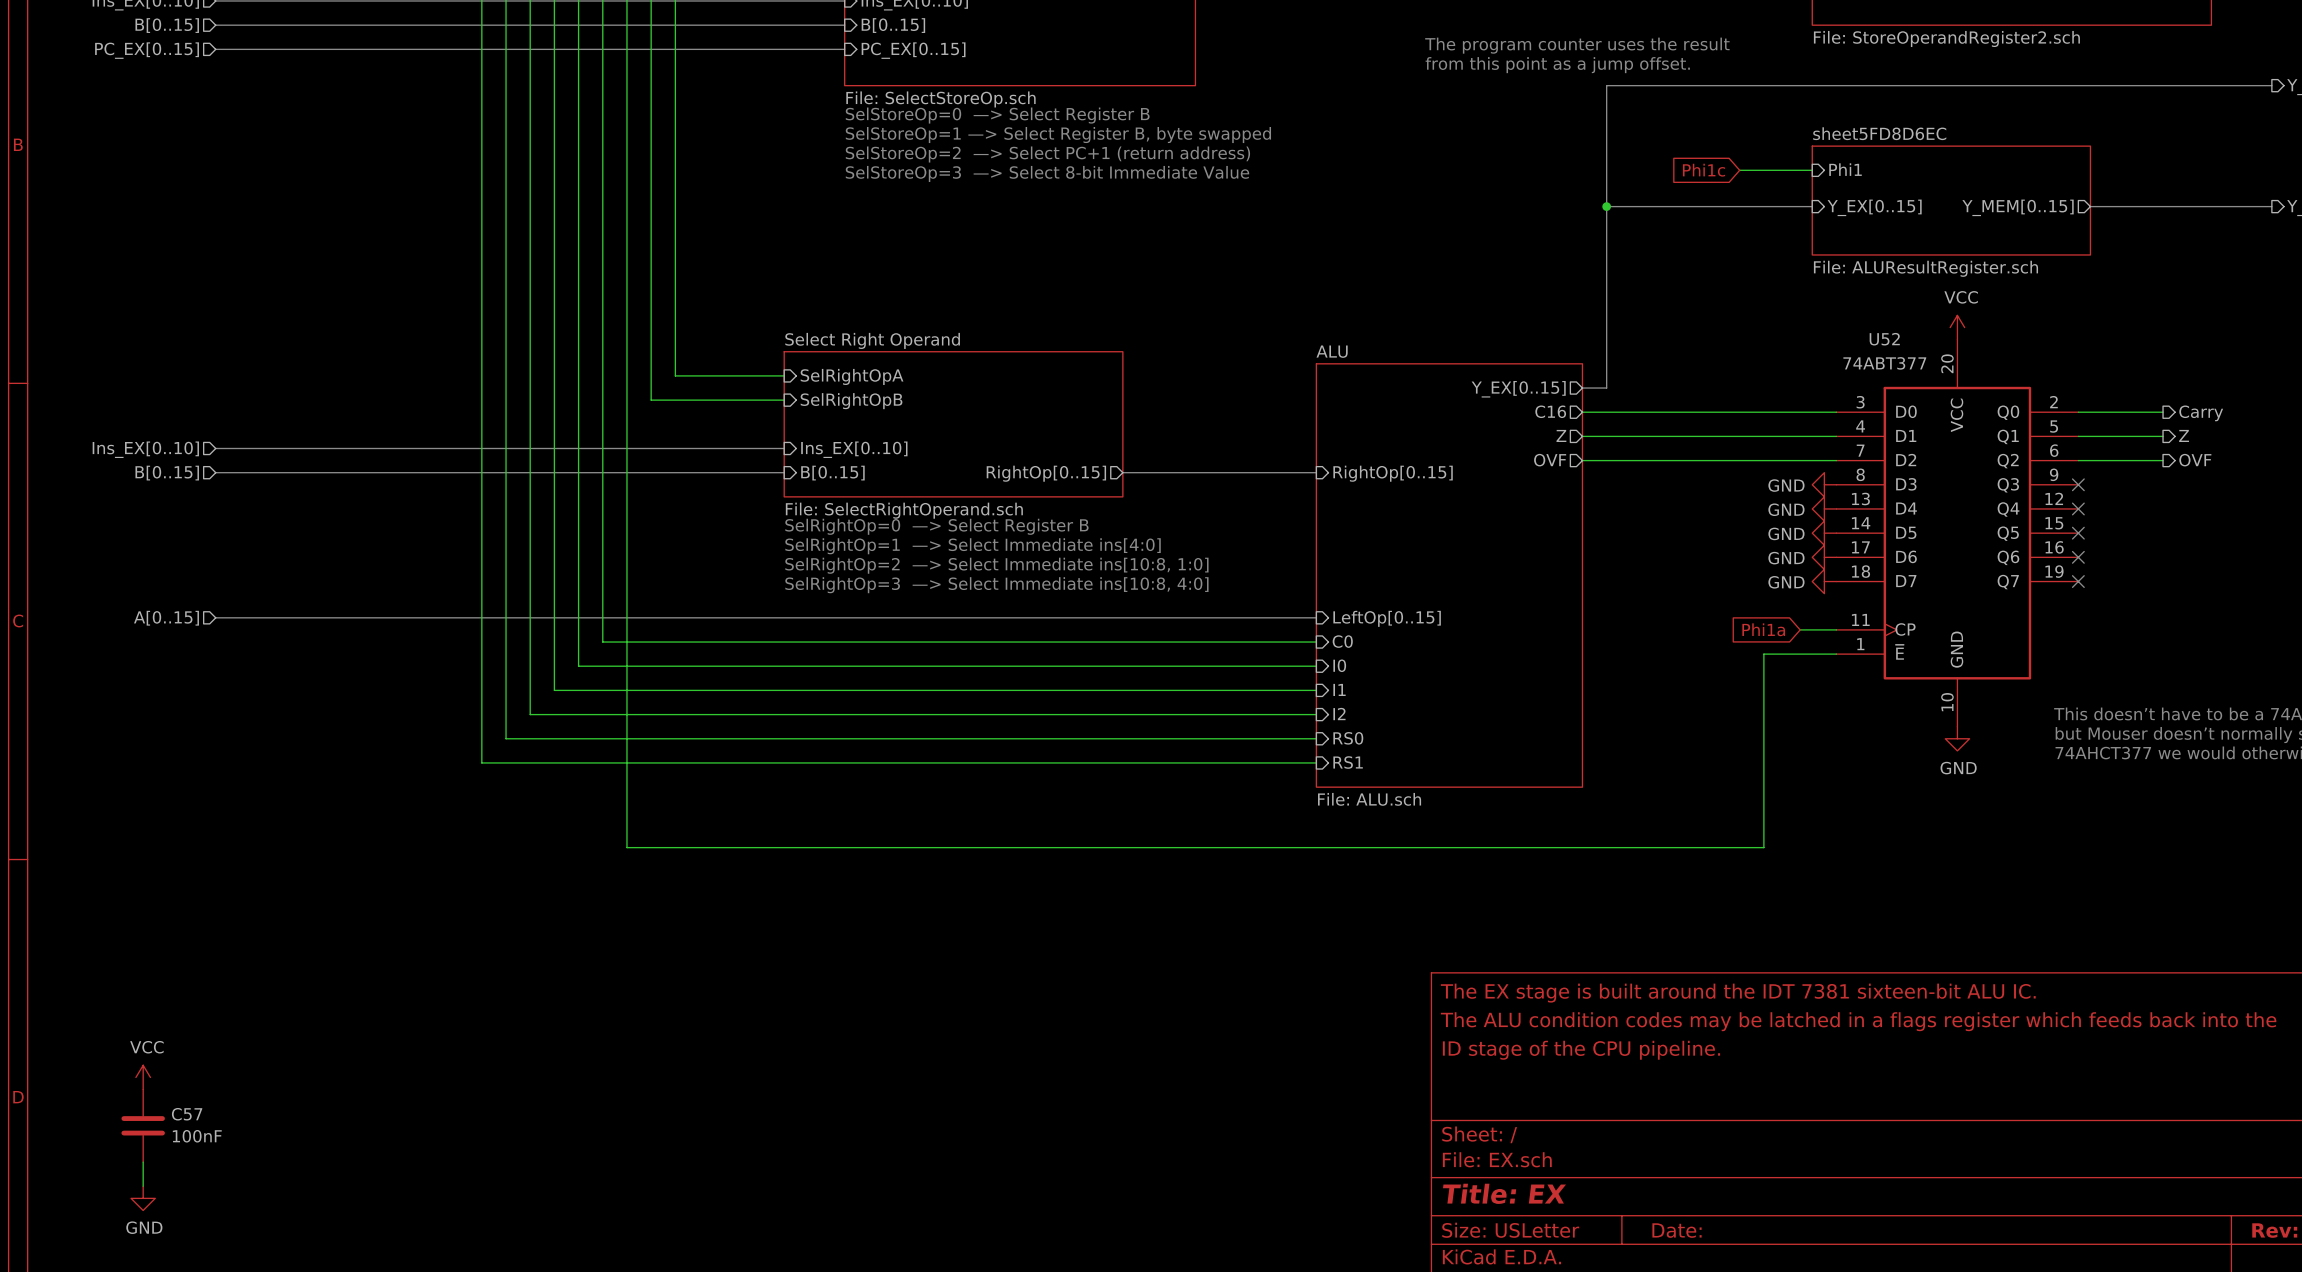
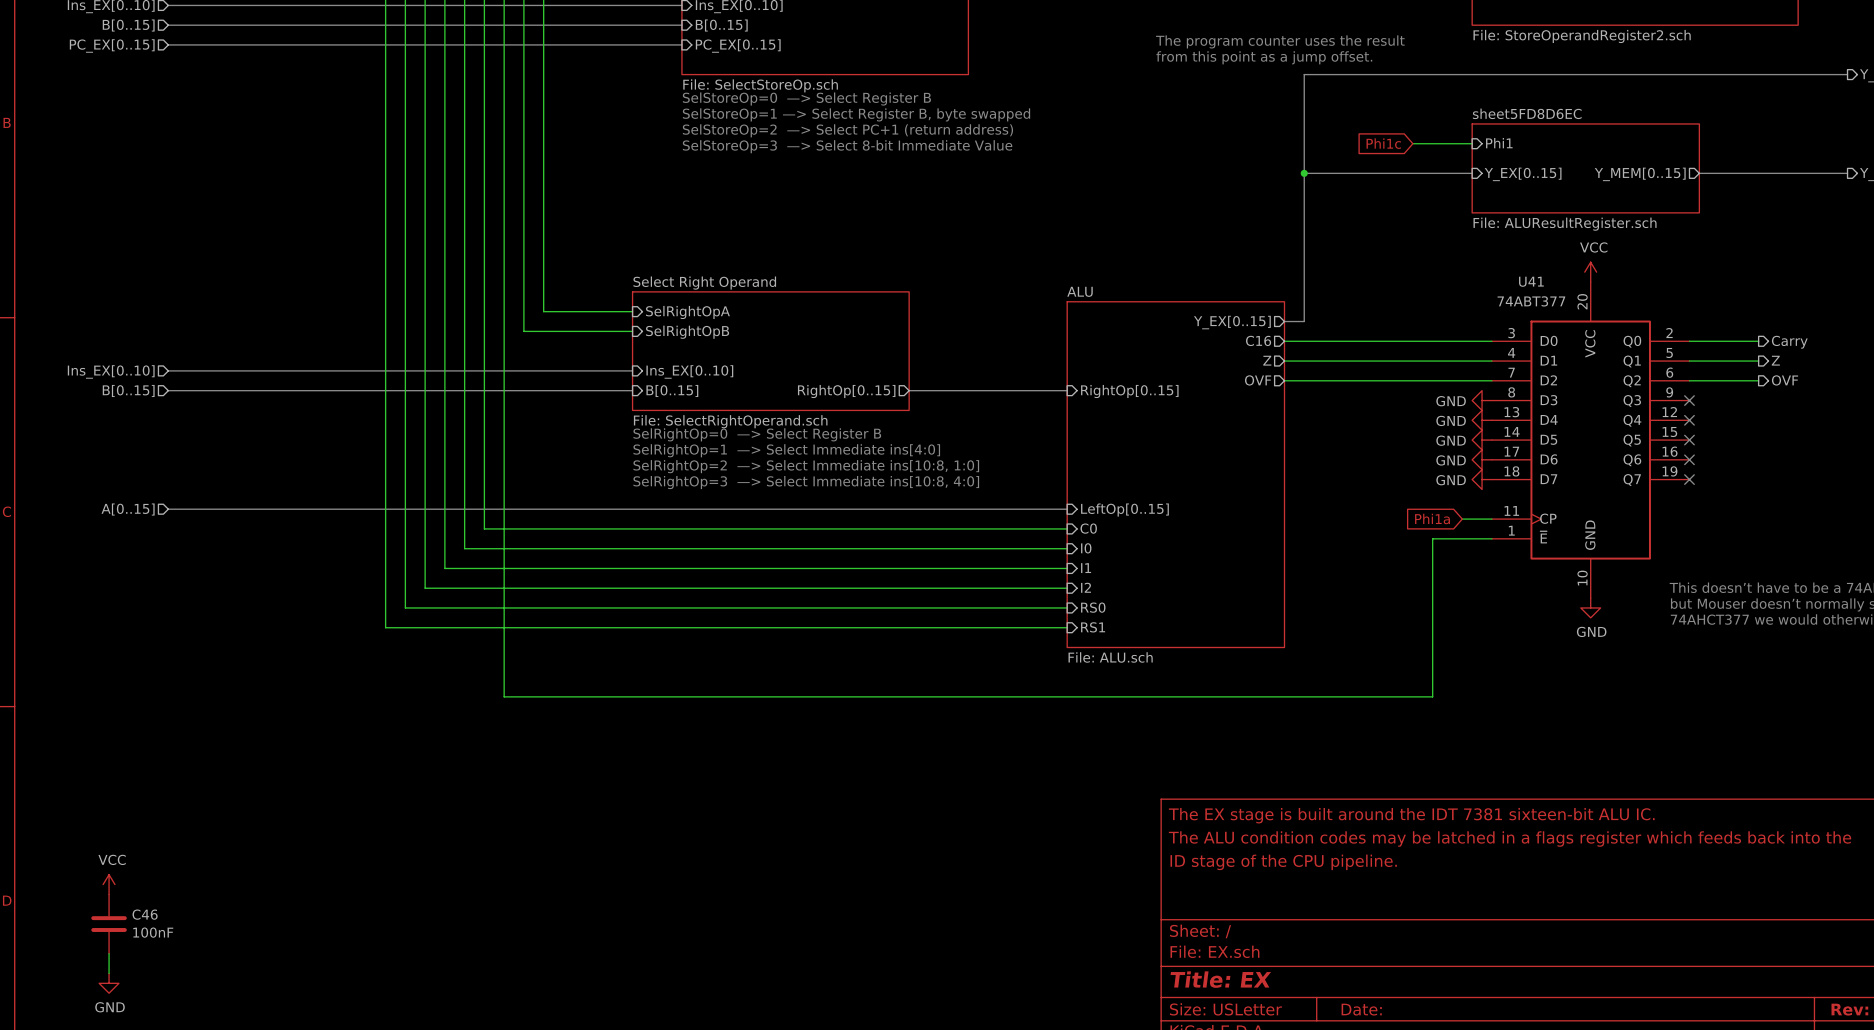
U52 name: U52 (1884, 339) -> U41 (1531, 281)
C57 name: C57 (187, 1114) -> C46 (145, 914)

